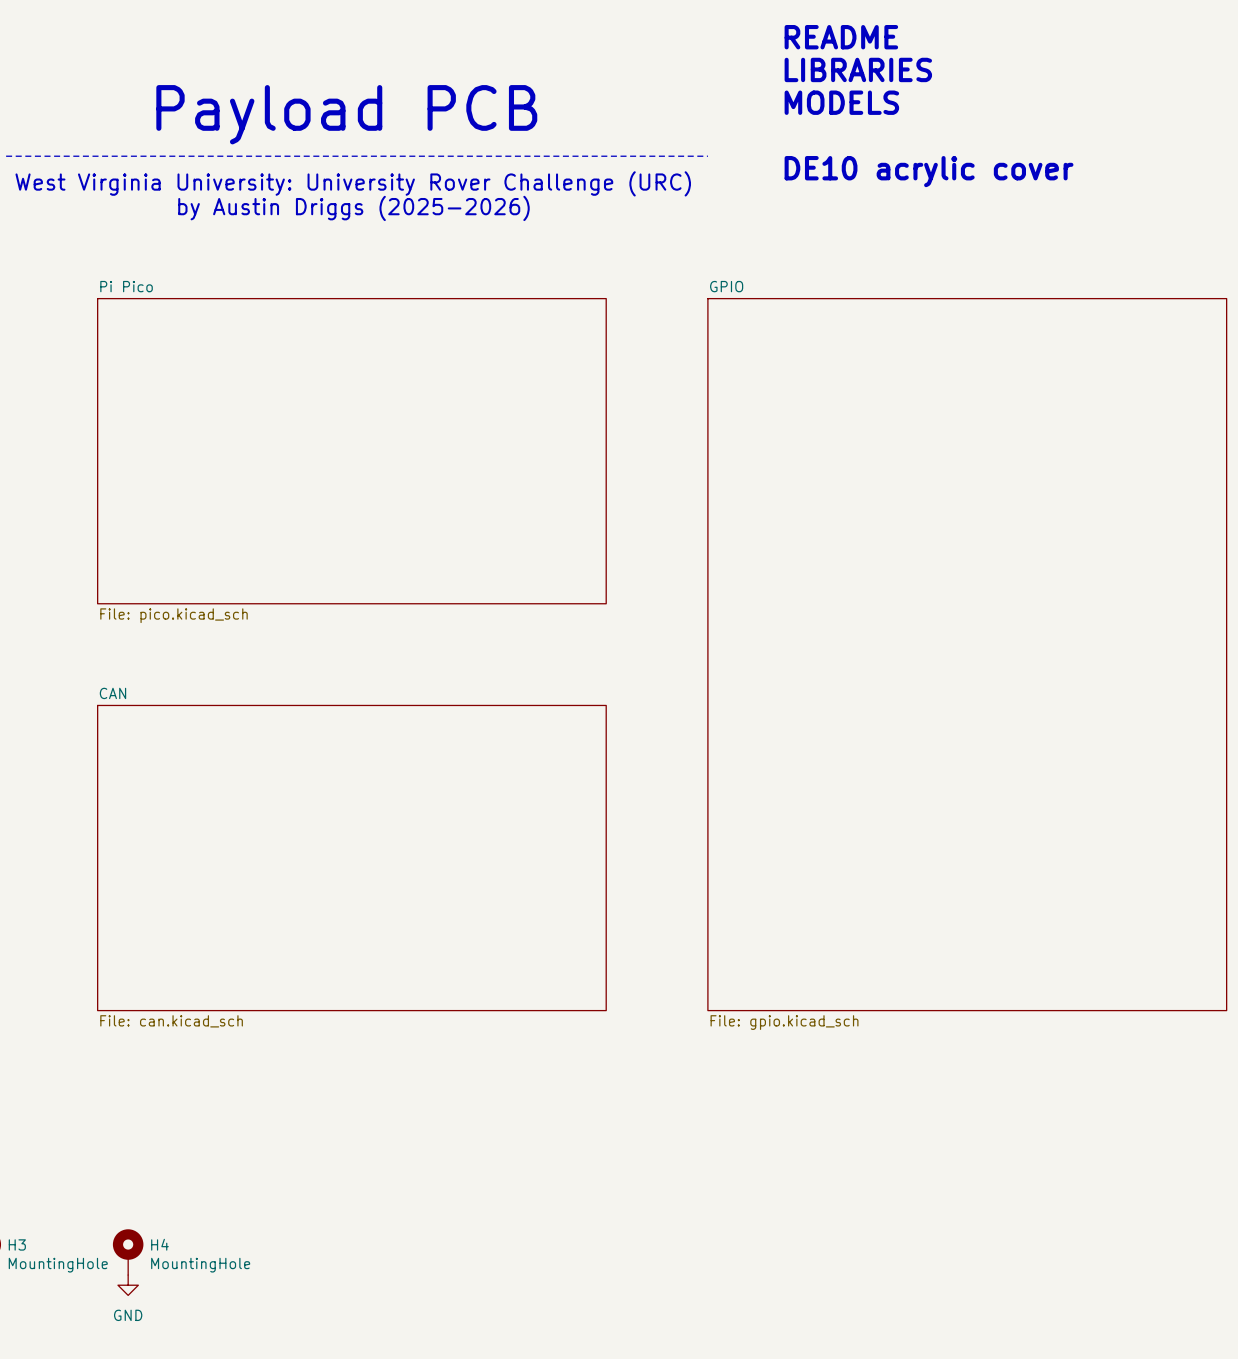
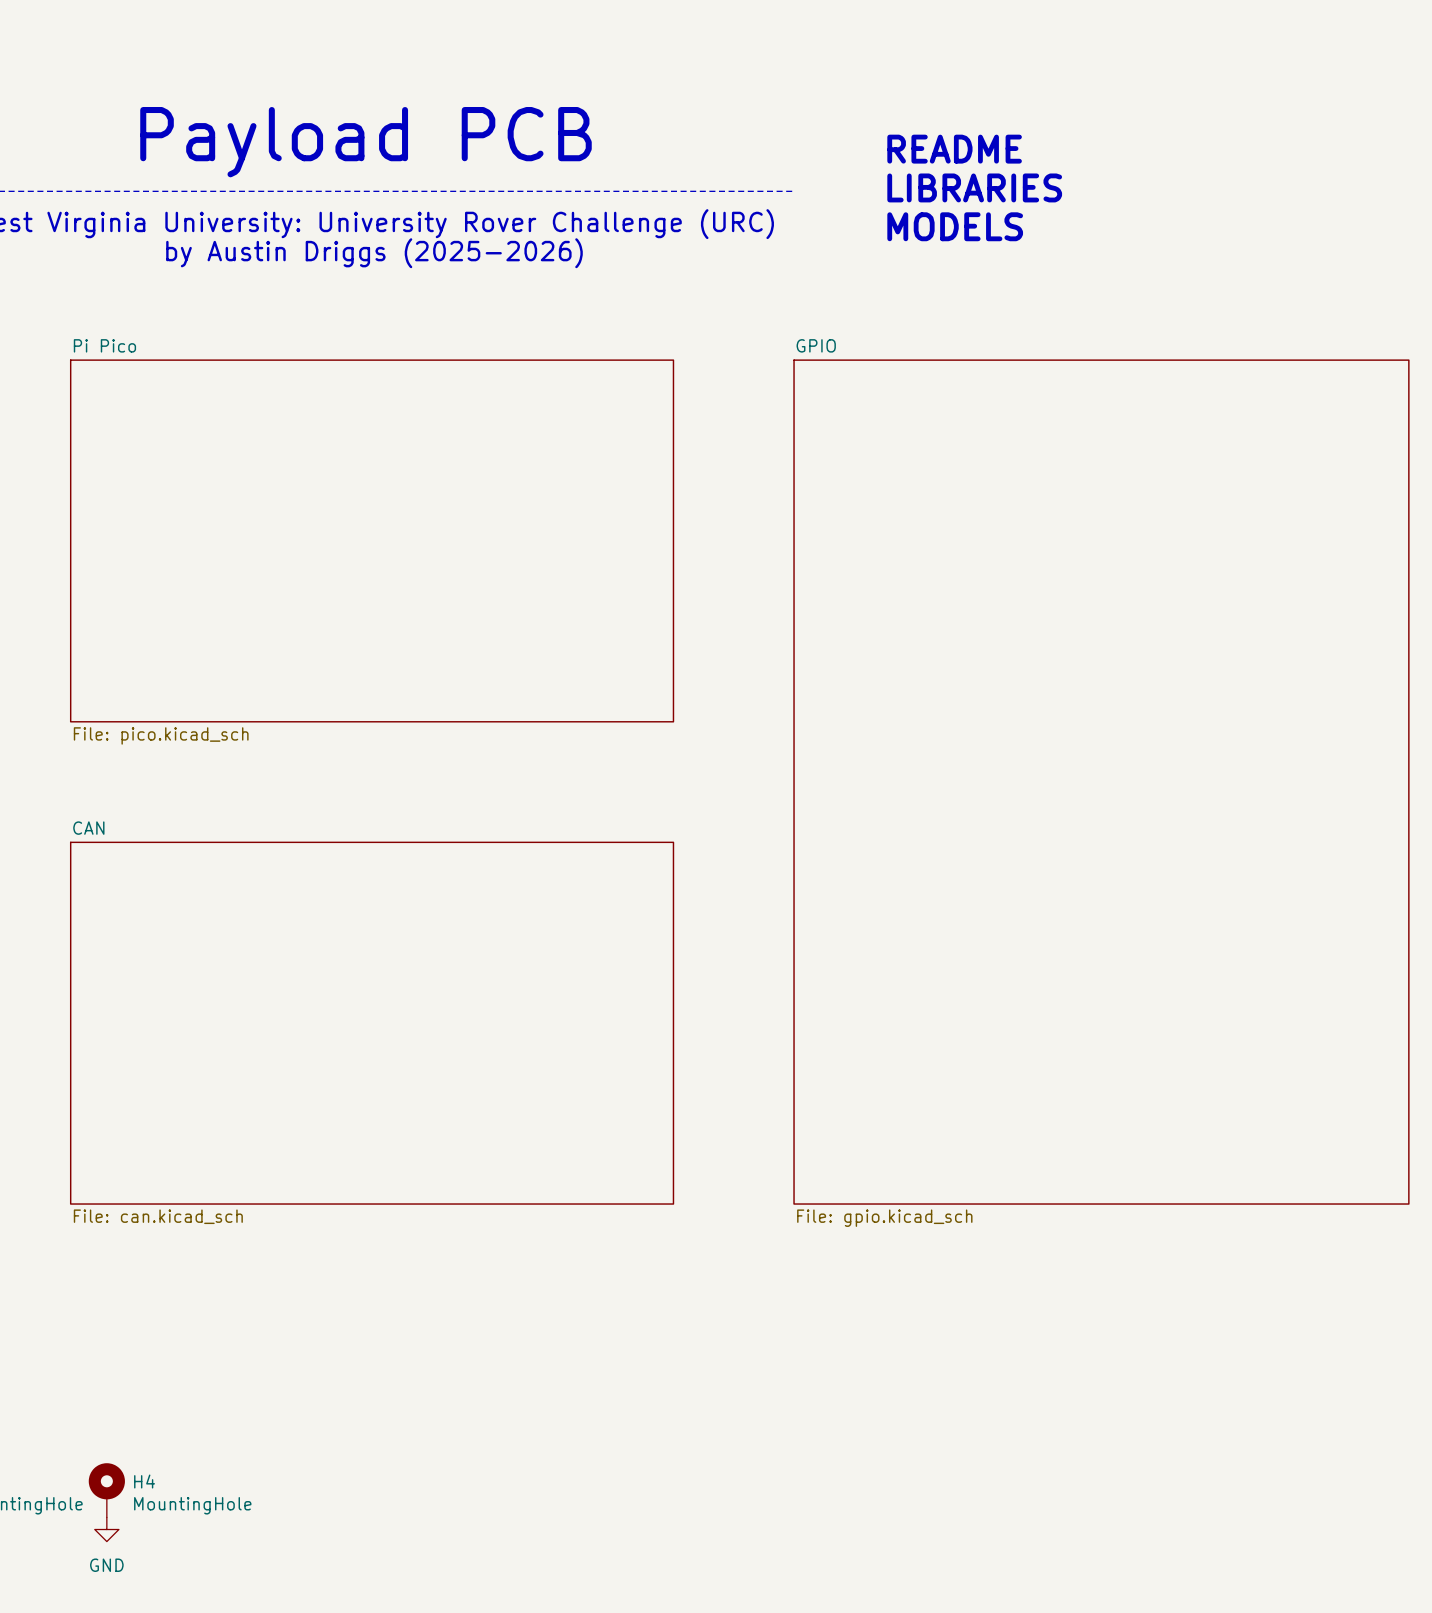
text position: README (841, 37) -> README (954, 149)
text position: LIBRARIES (858, 69) -> LIBRARIES (974, 187)
text position: MODELS (841, 102) -> MODELS (955, 226)
text: DE10 acrylic cover (929, 171) -> none

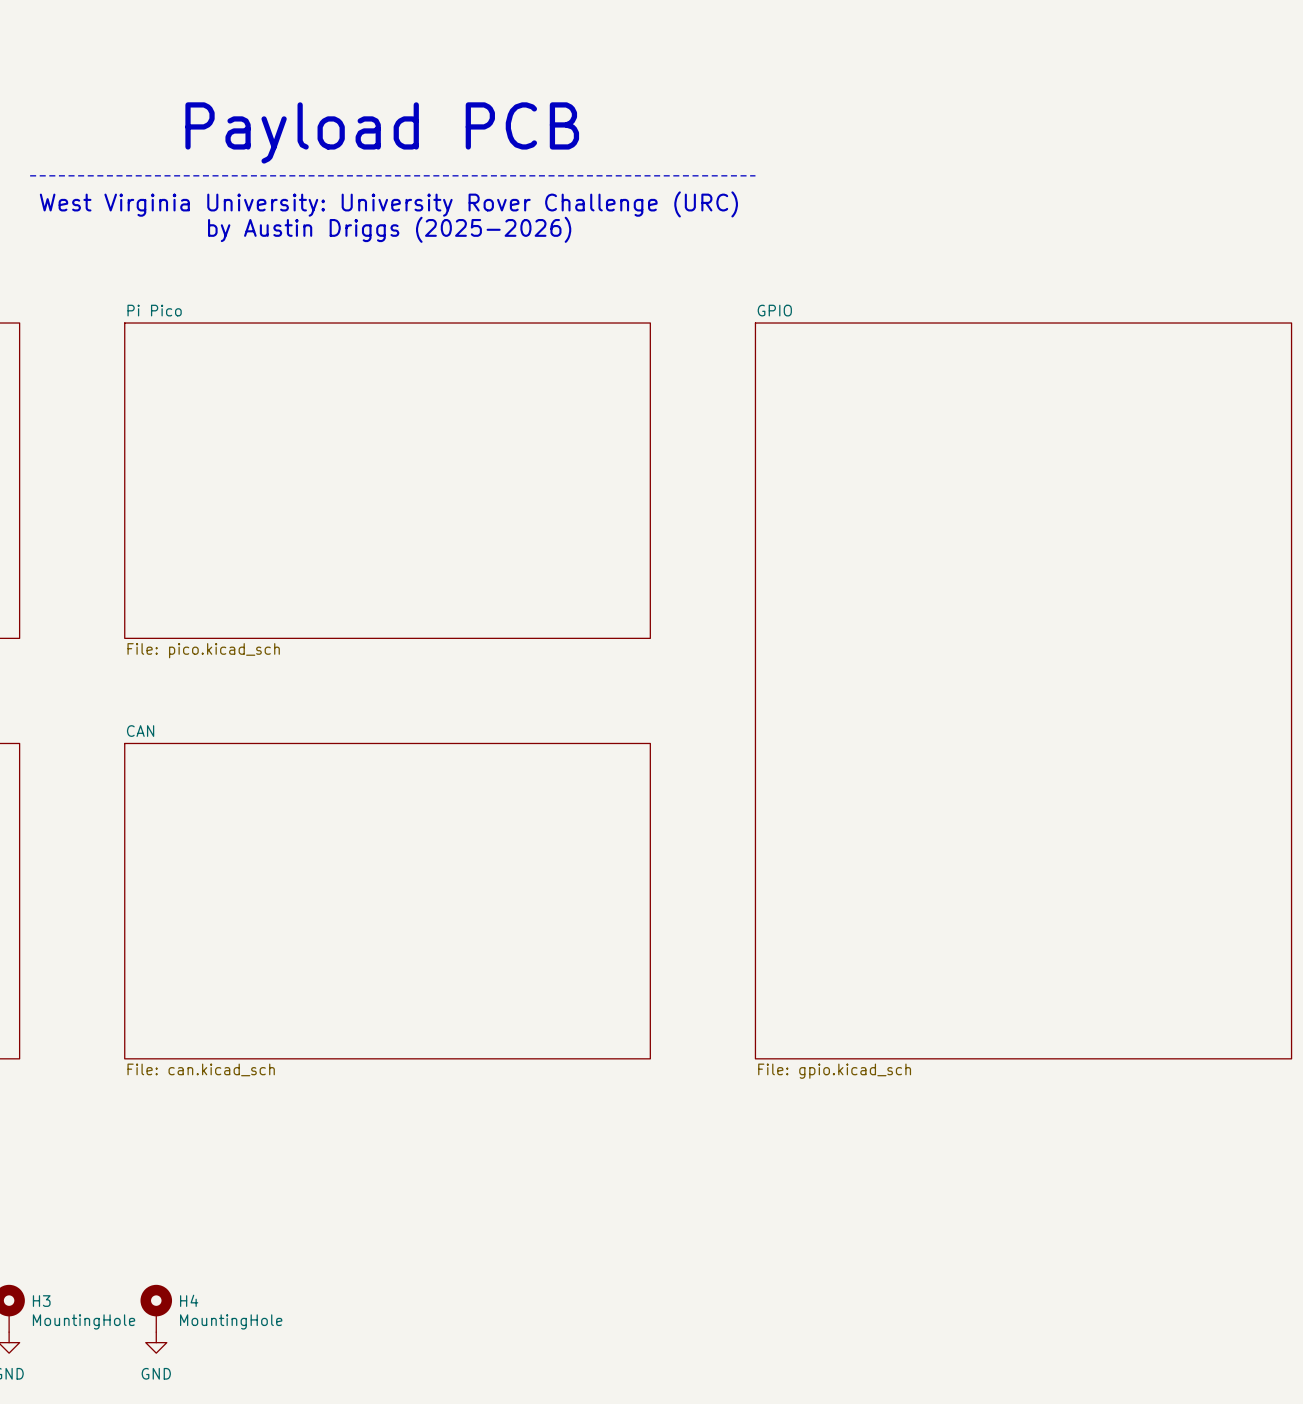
text: README (954, 149) -> none
text: LIBRARIES (974, 187) -> none
text: MODELS (955, 226) -> none

